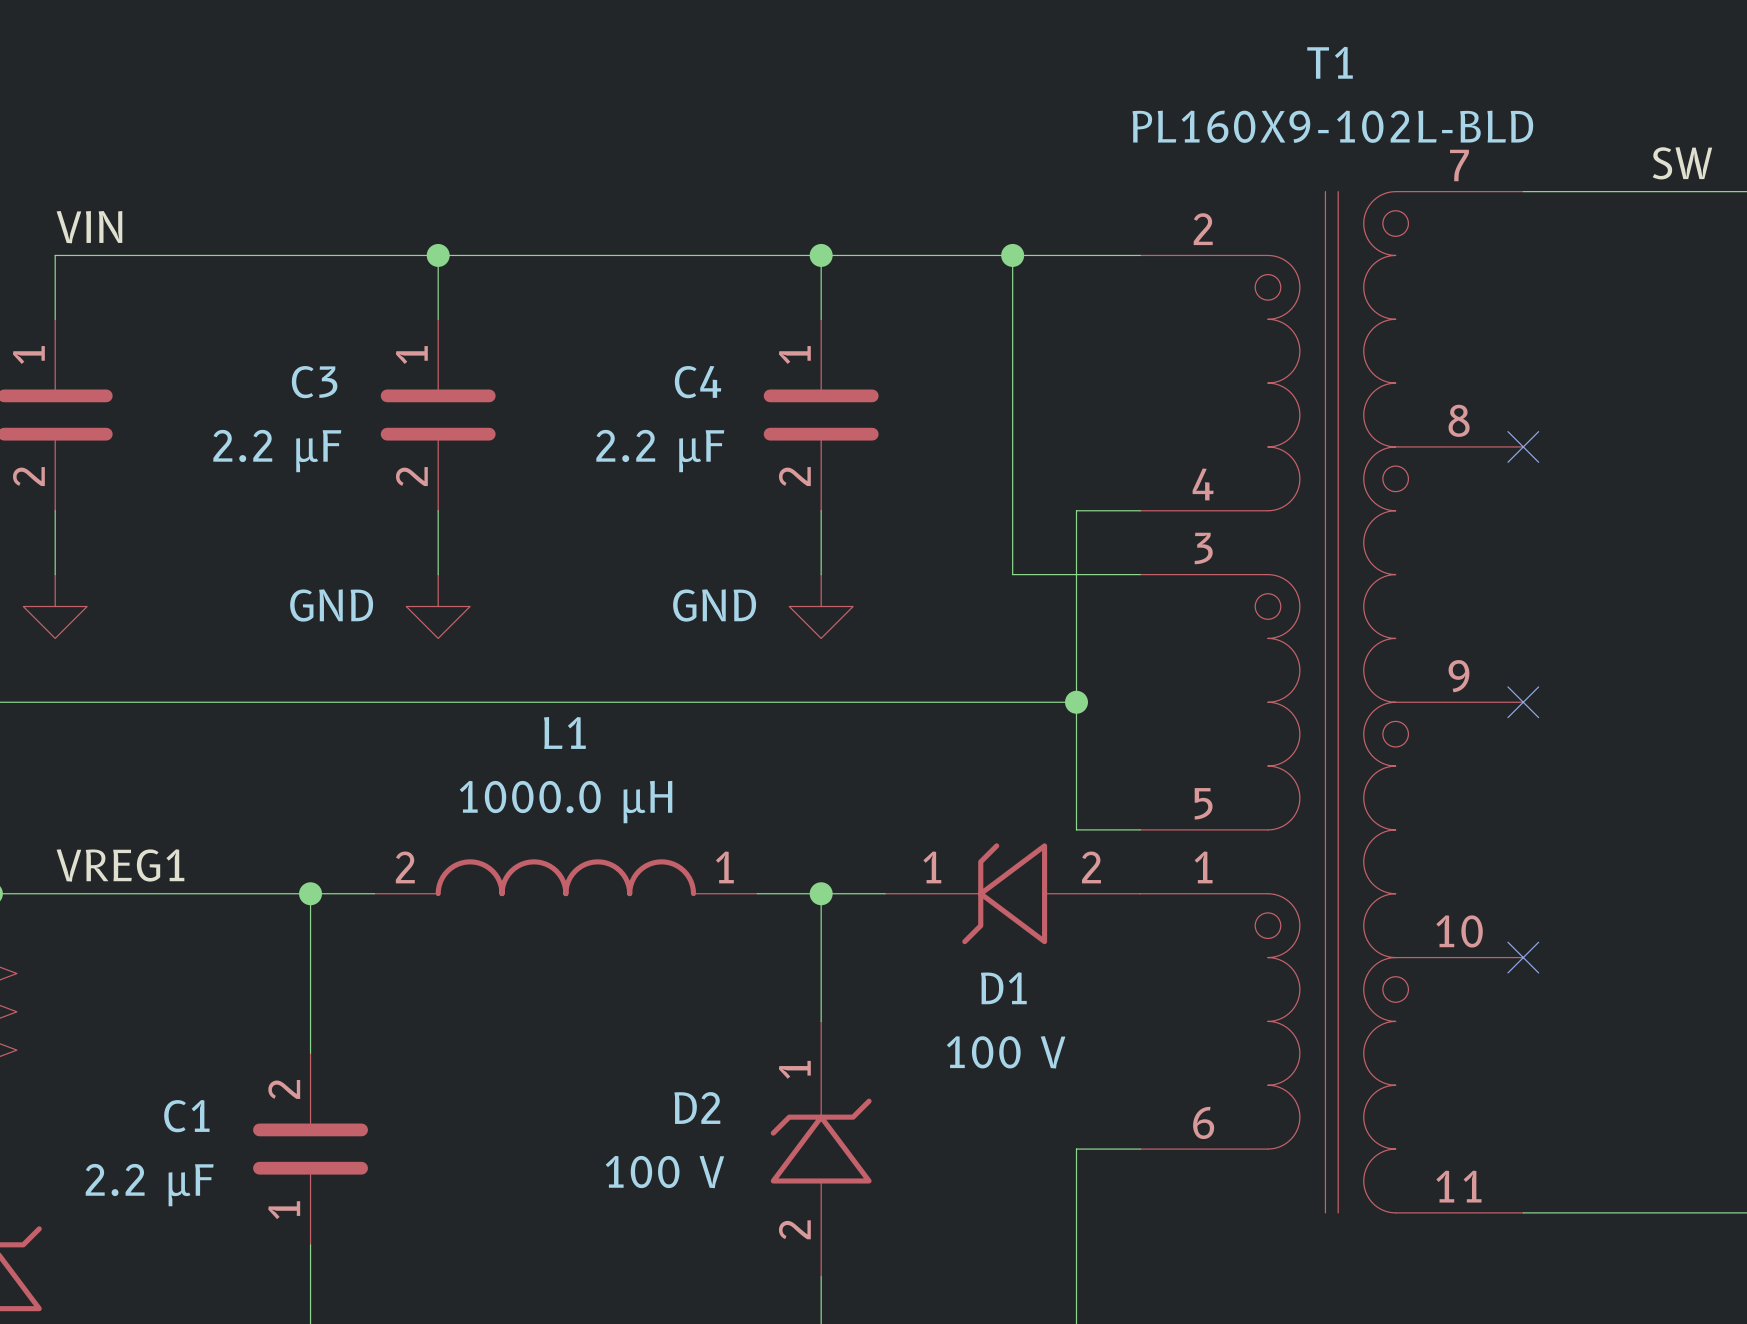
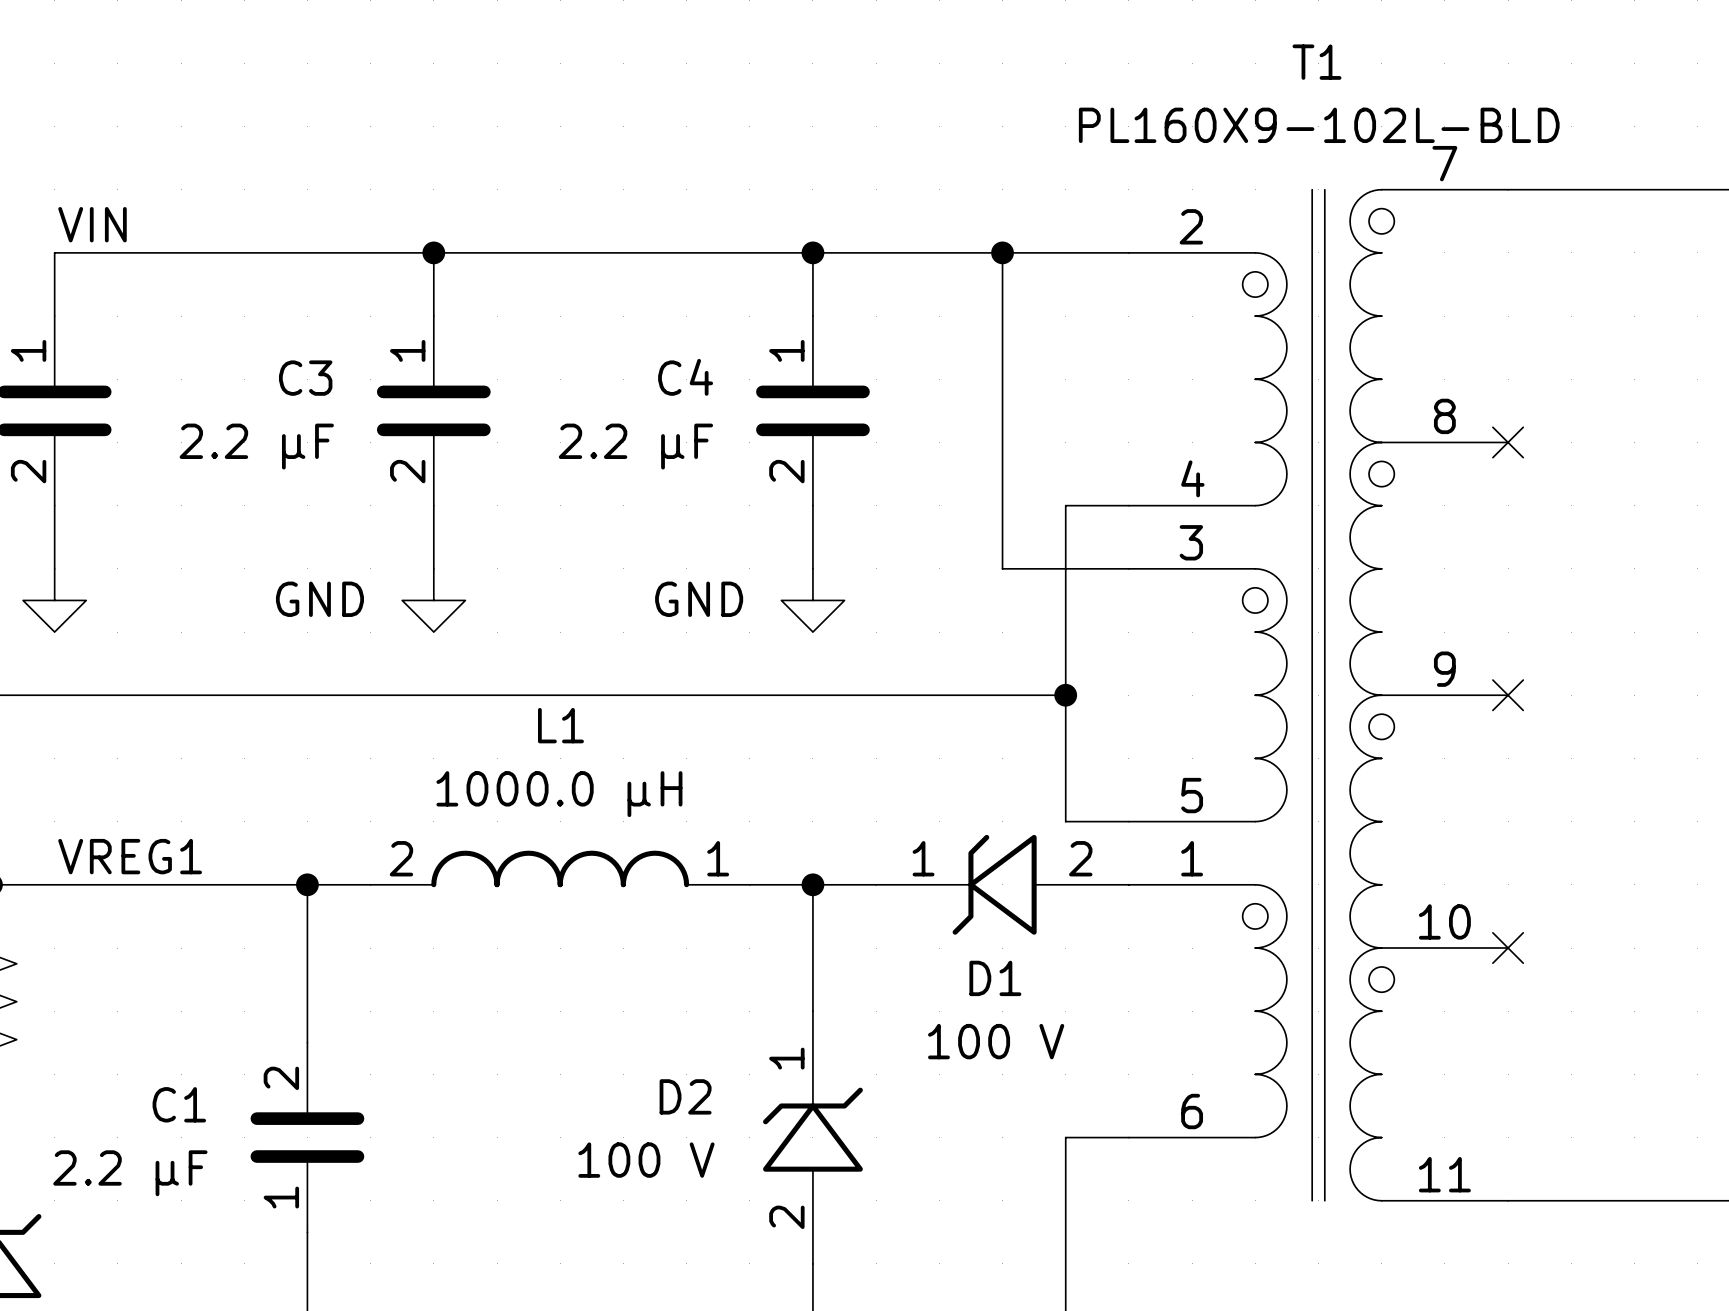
label: SW (1682, 163) -> none

